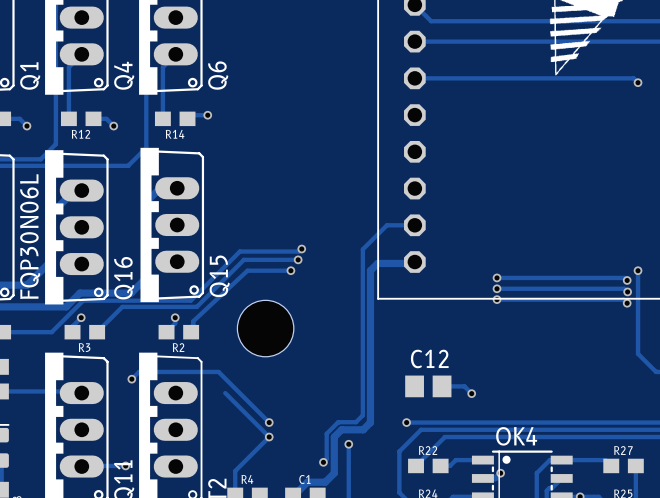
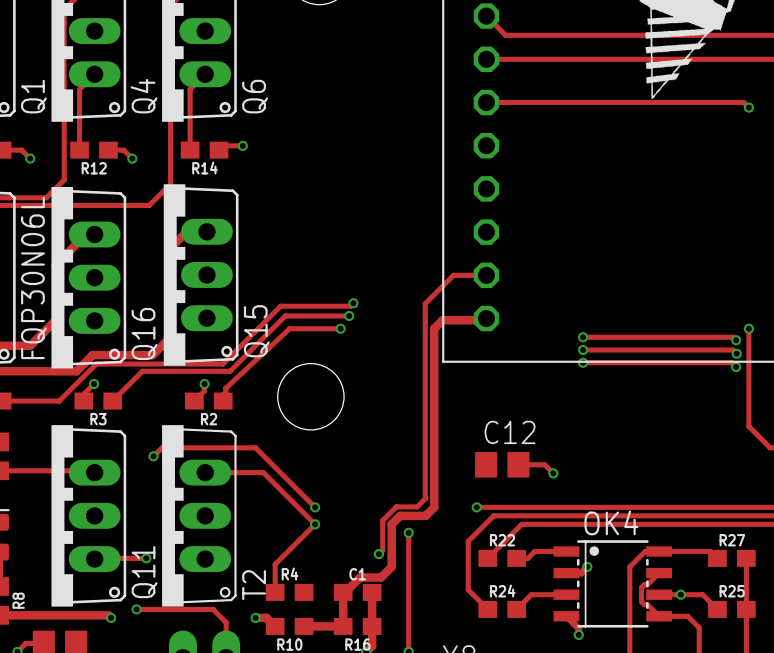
track: none -> (205, 472) (263, 472)

